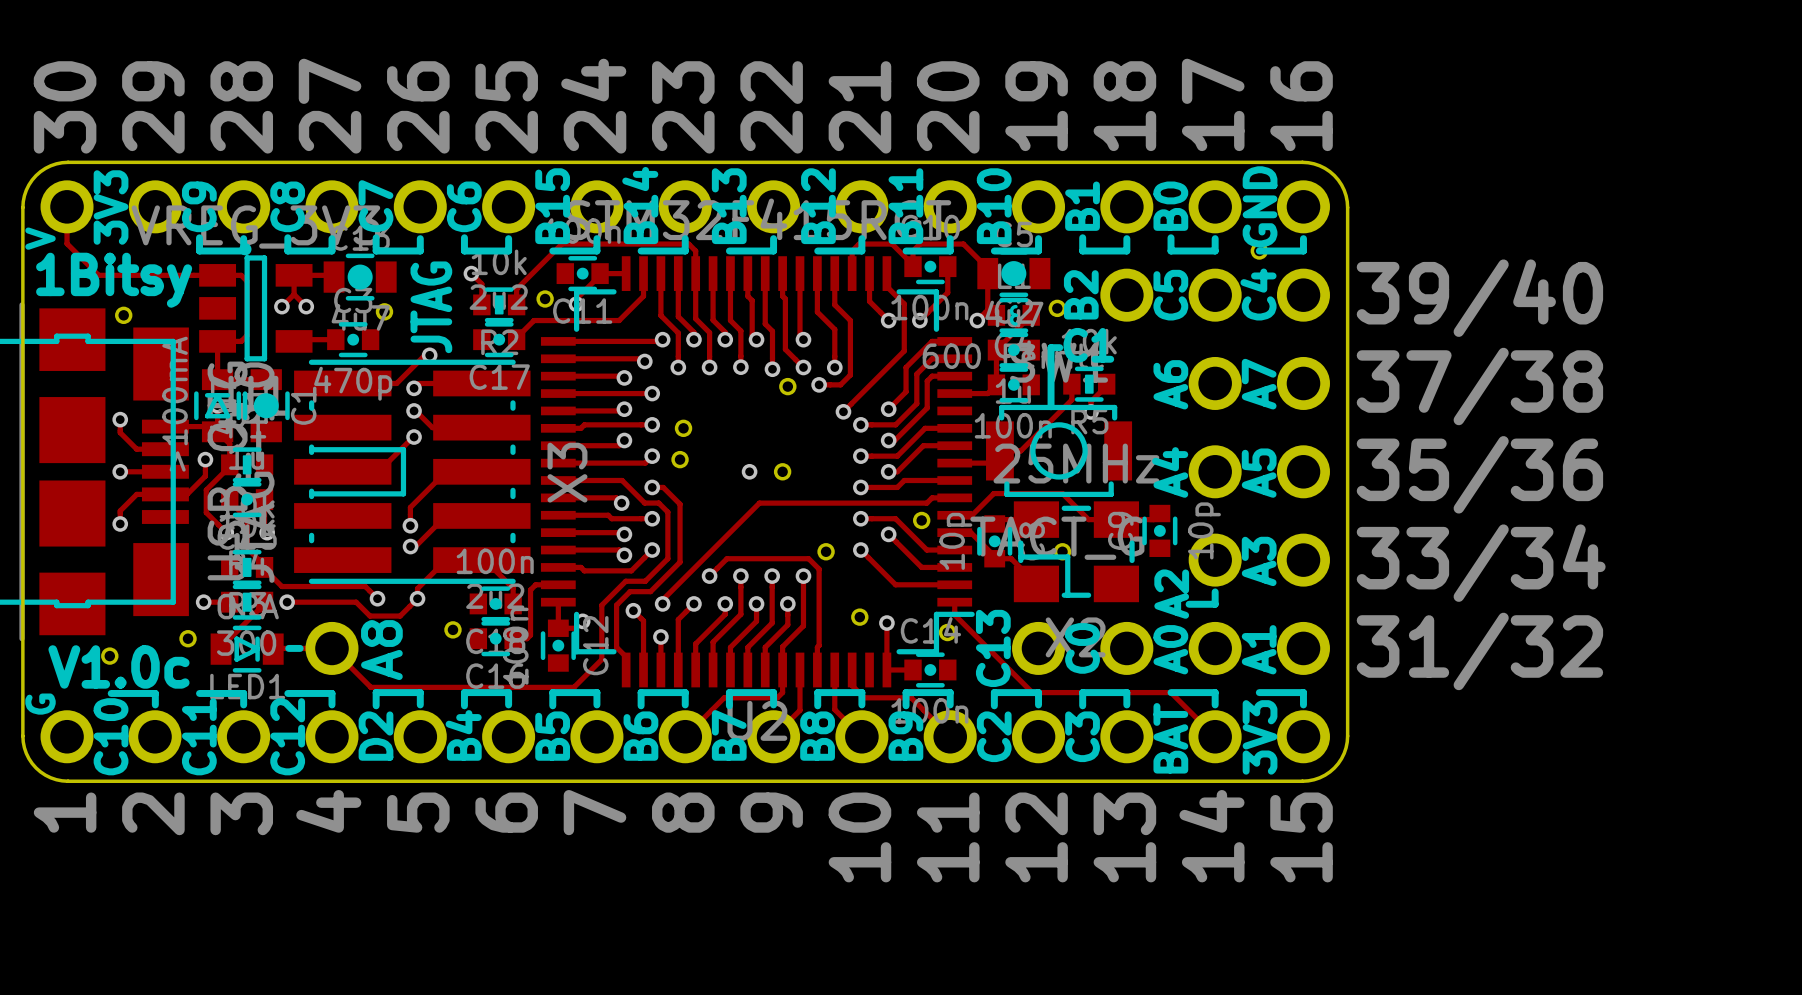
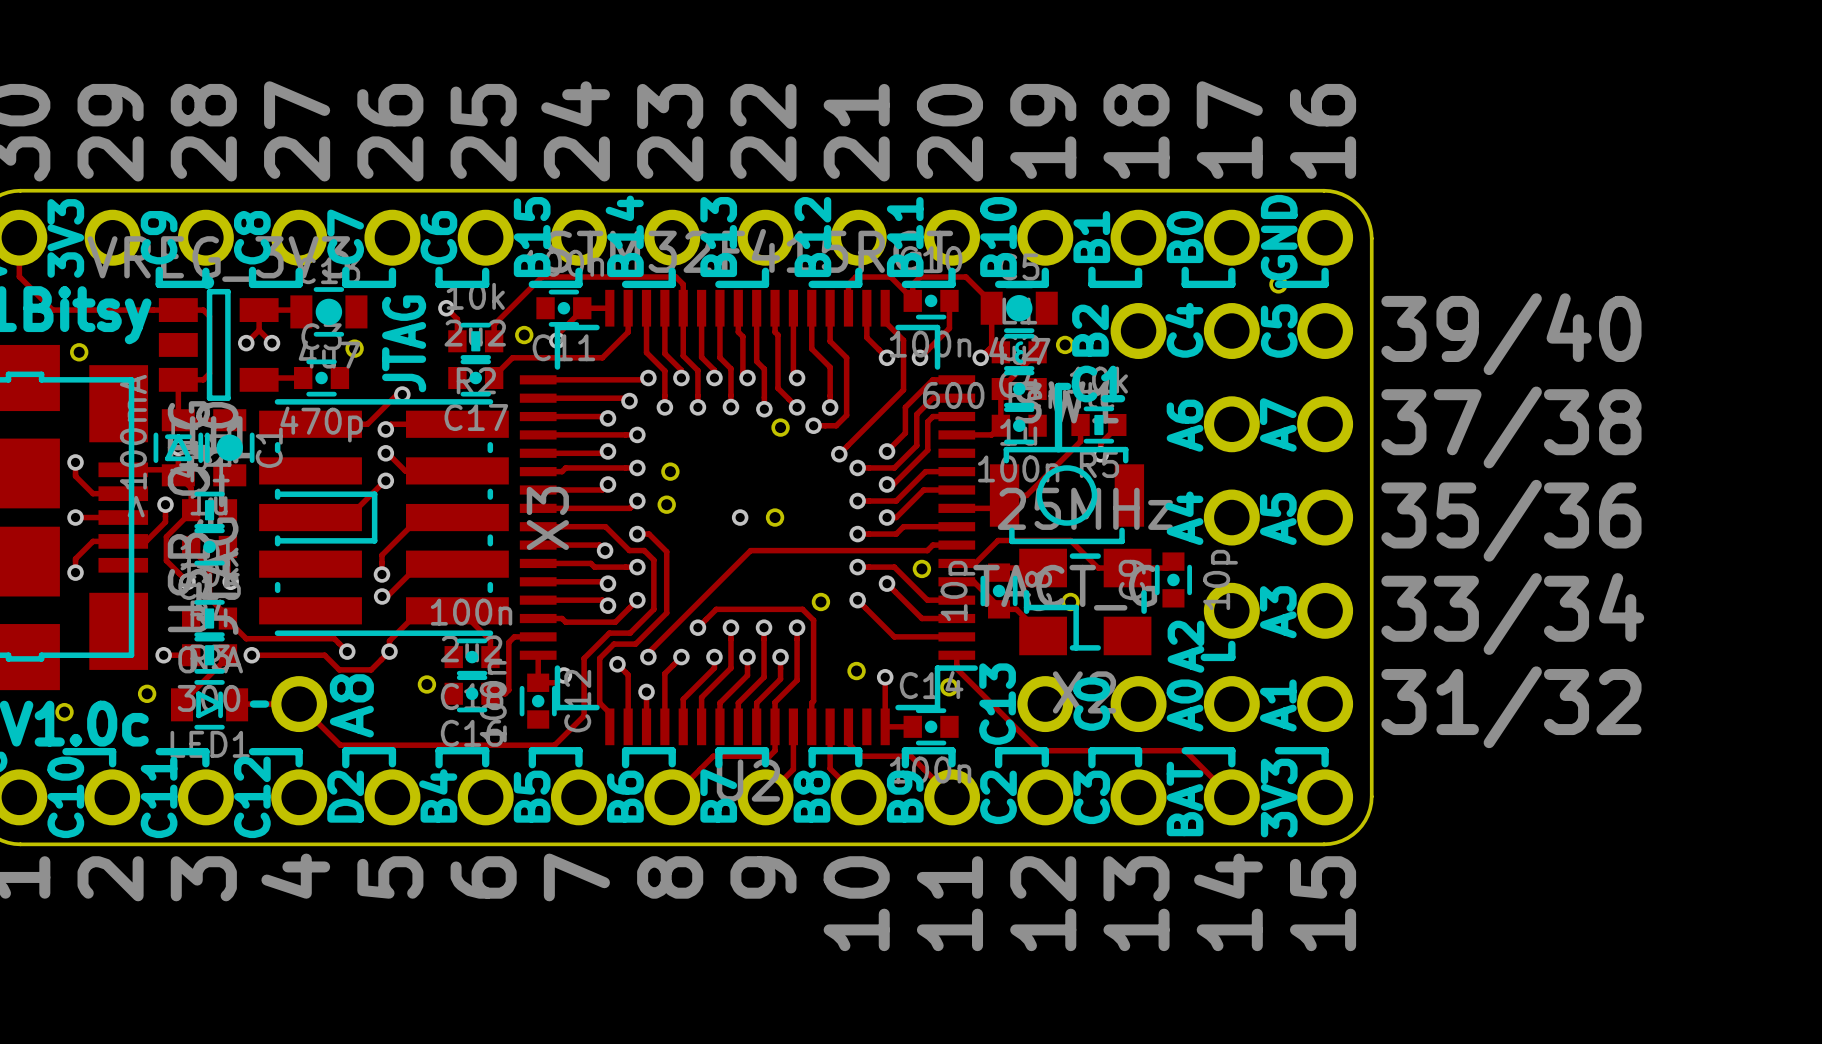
text: C4 (1258, 294) -> C5 (1279, 331)
text: C5 (1170, 295) -> C4 (1184, 330)

